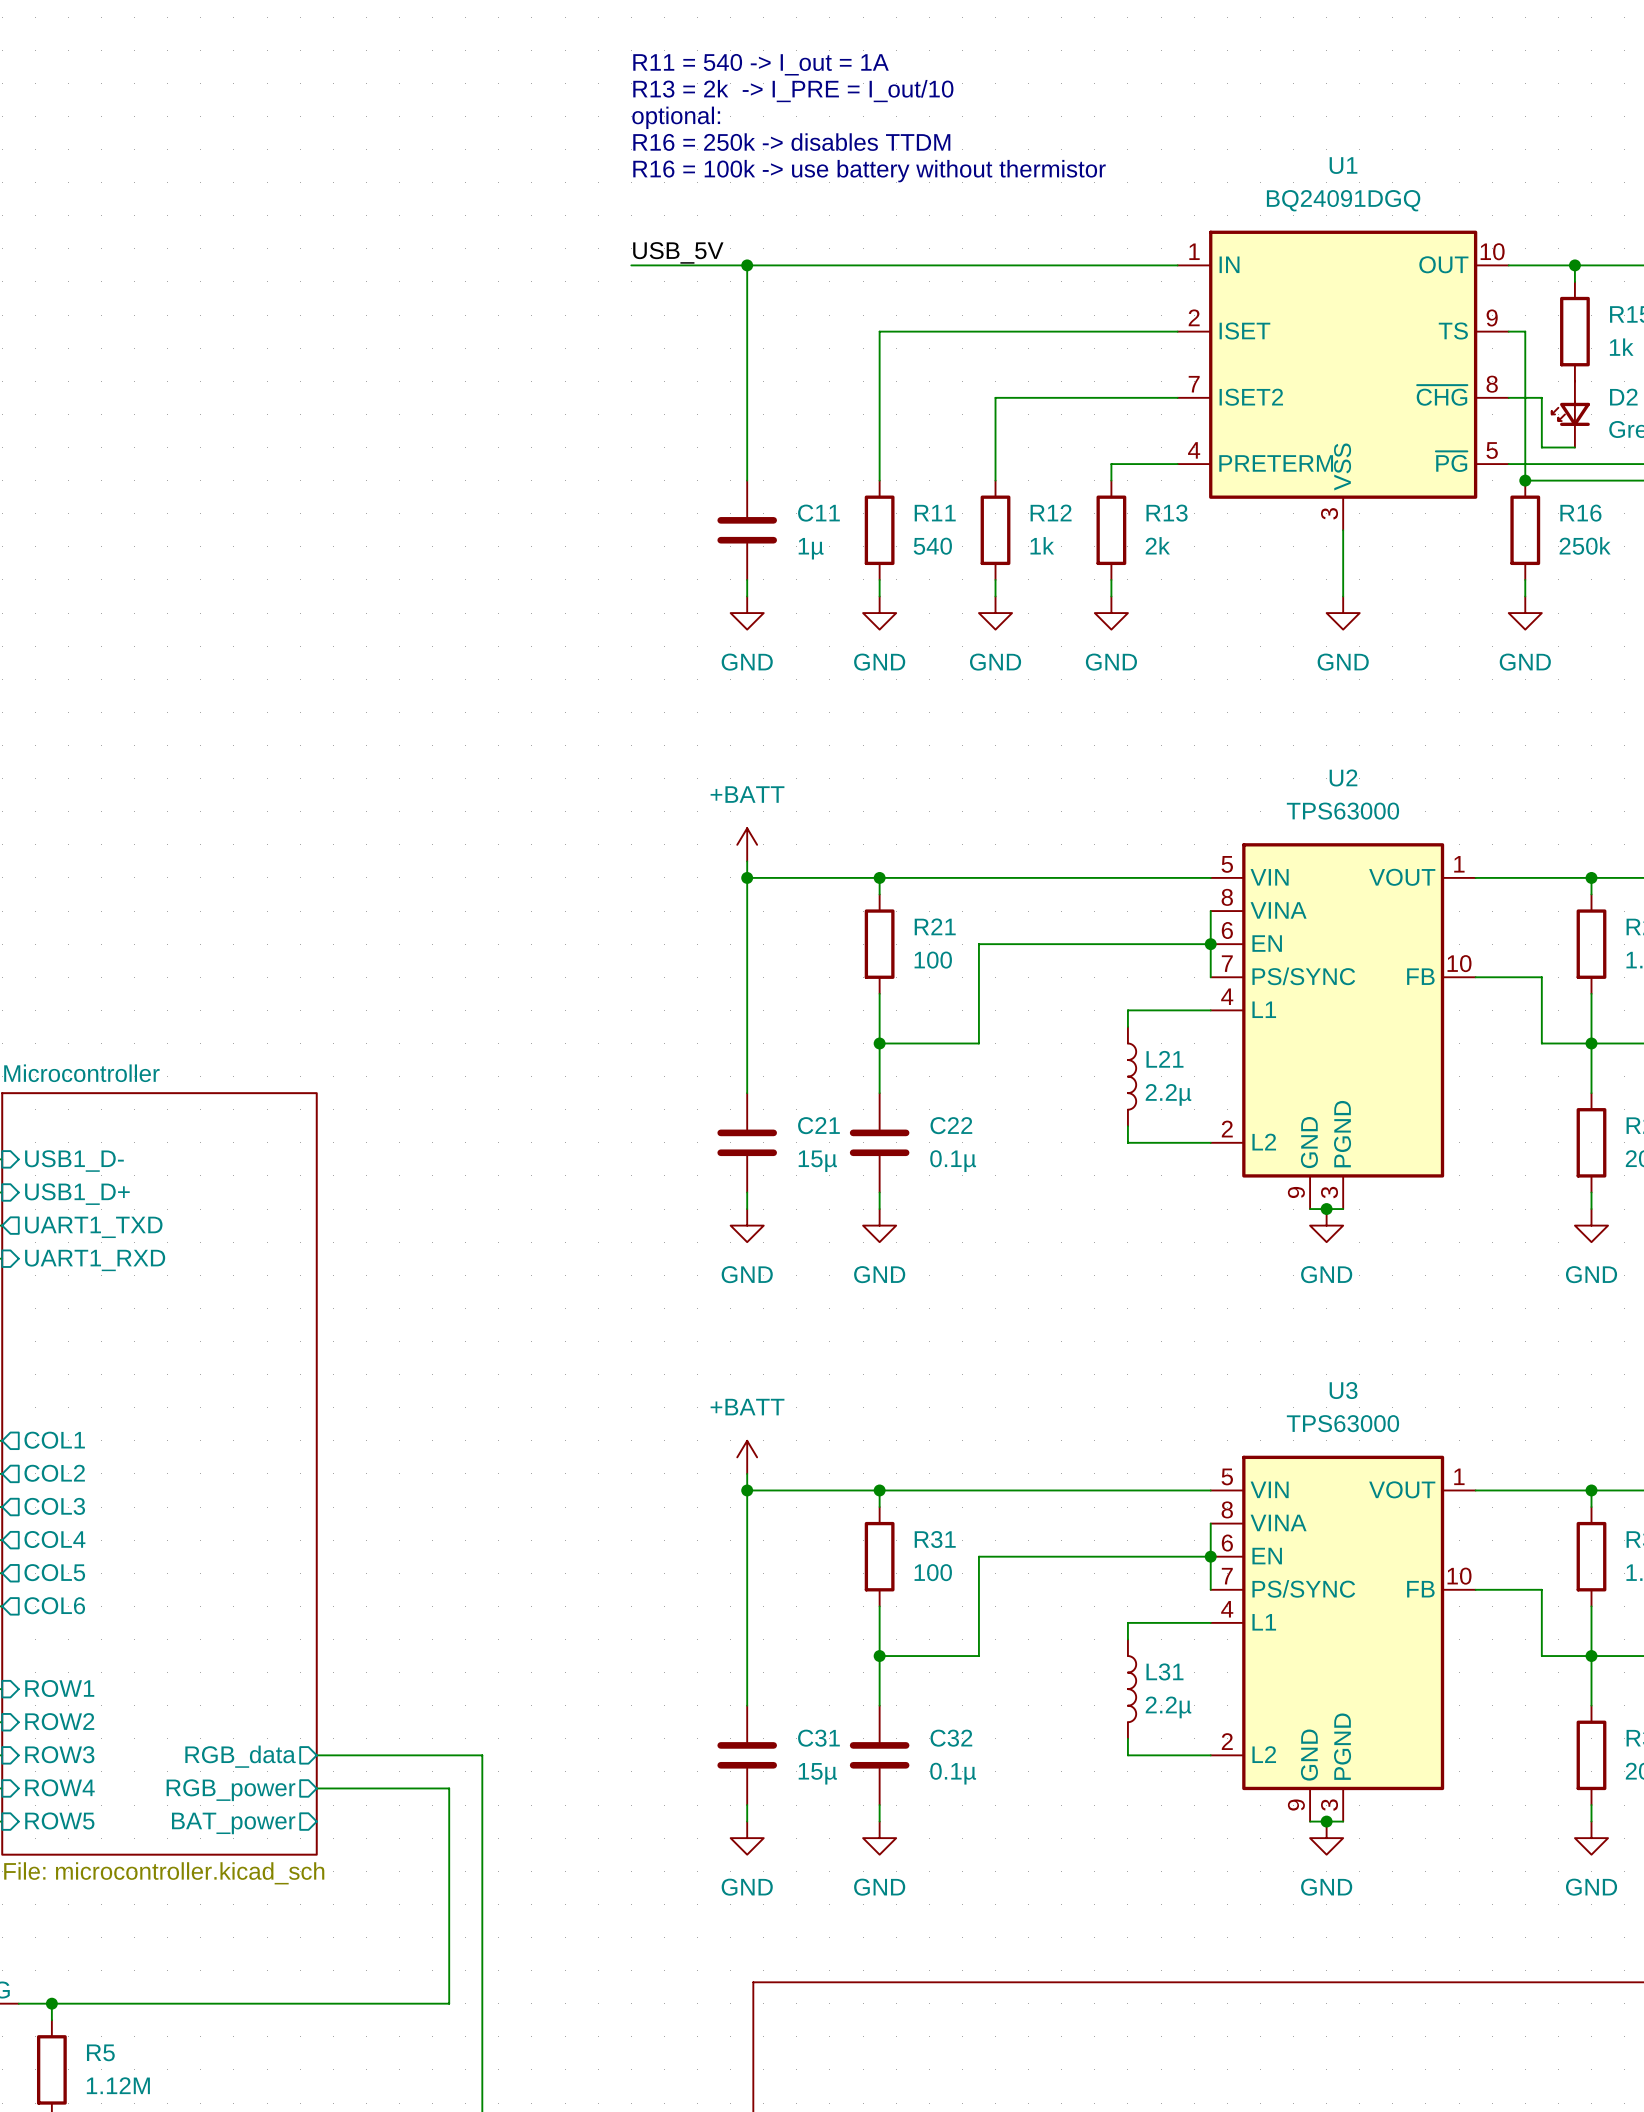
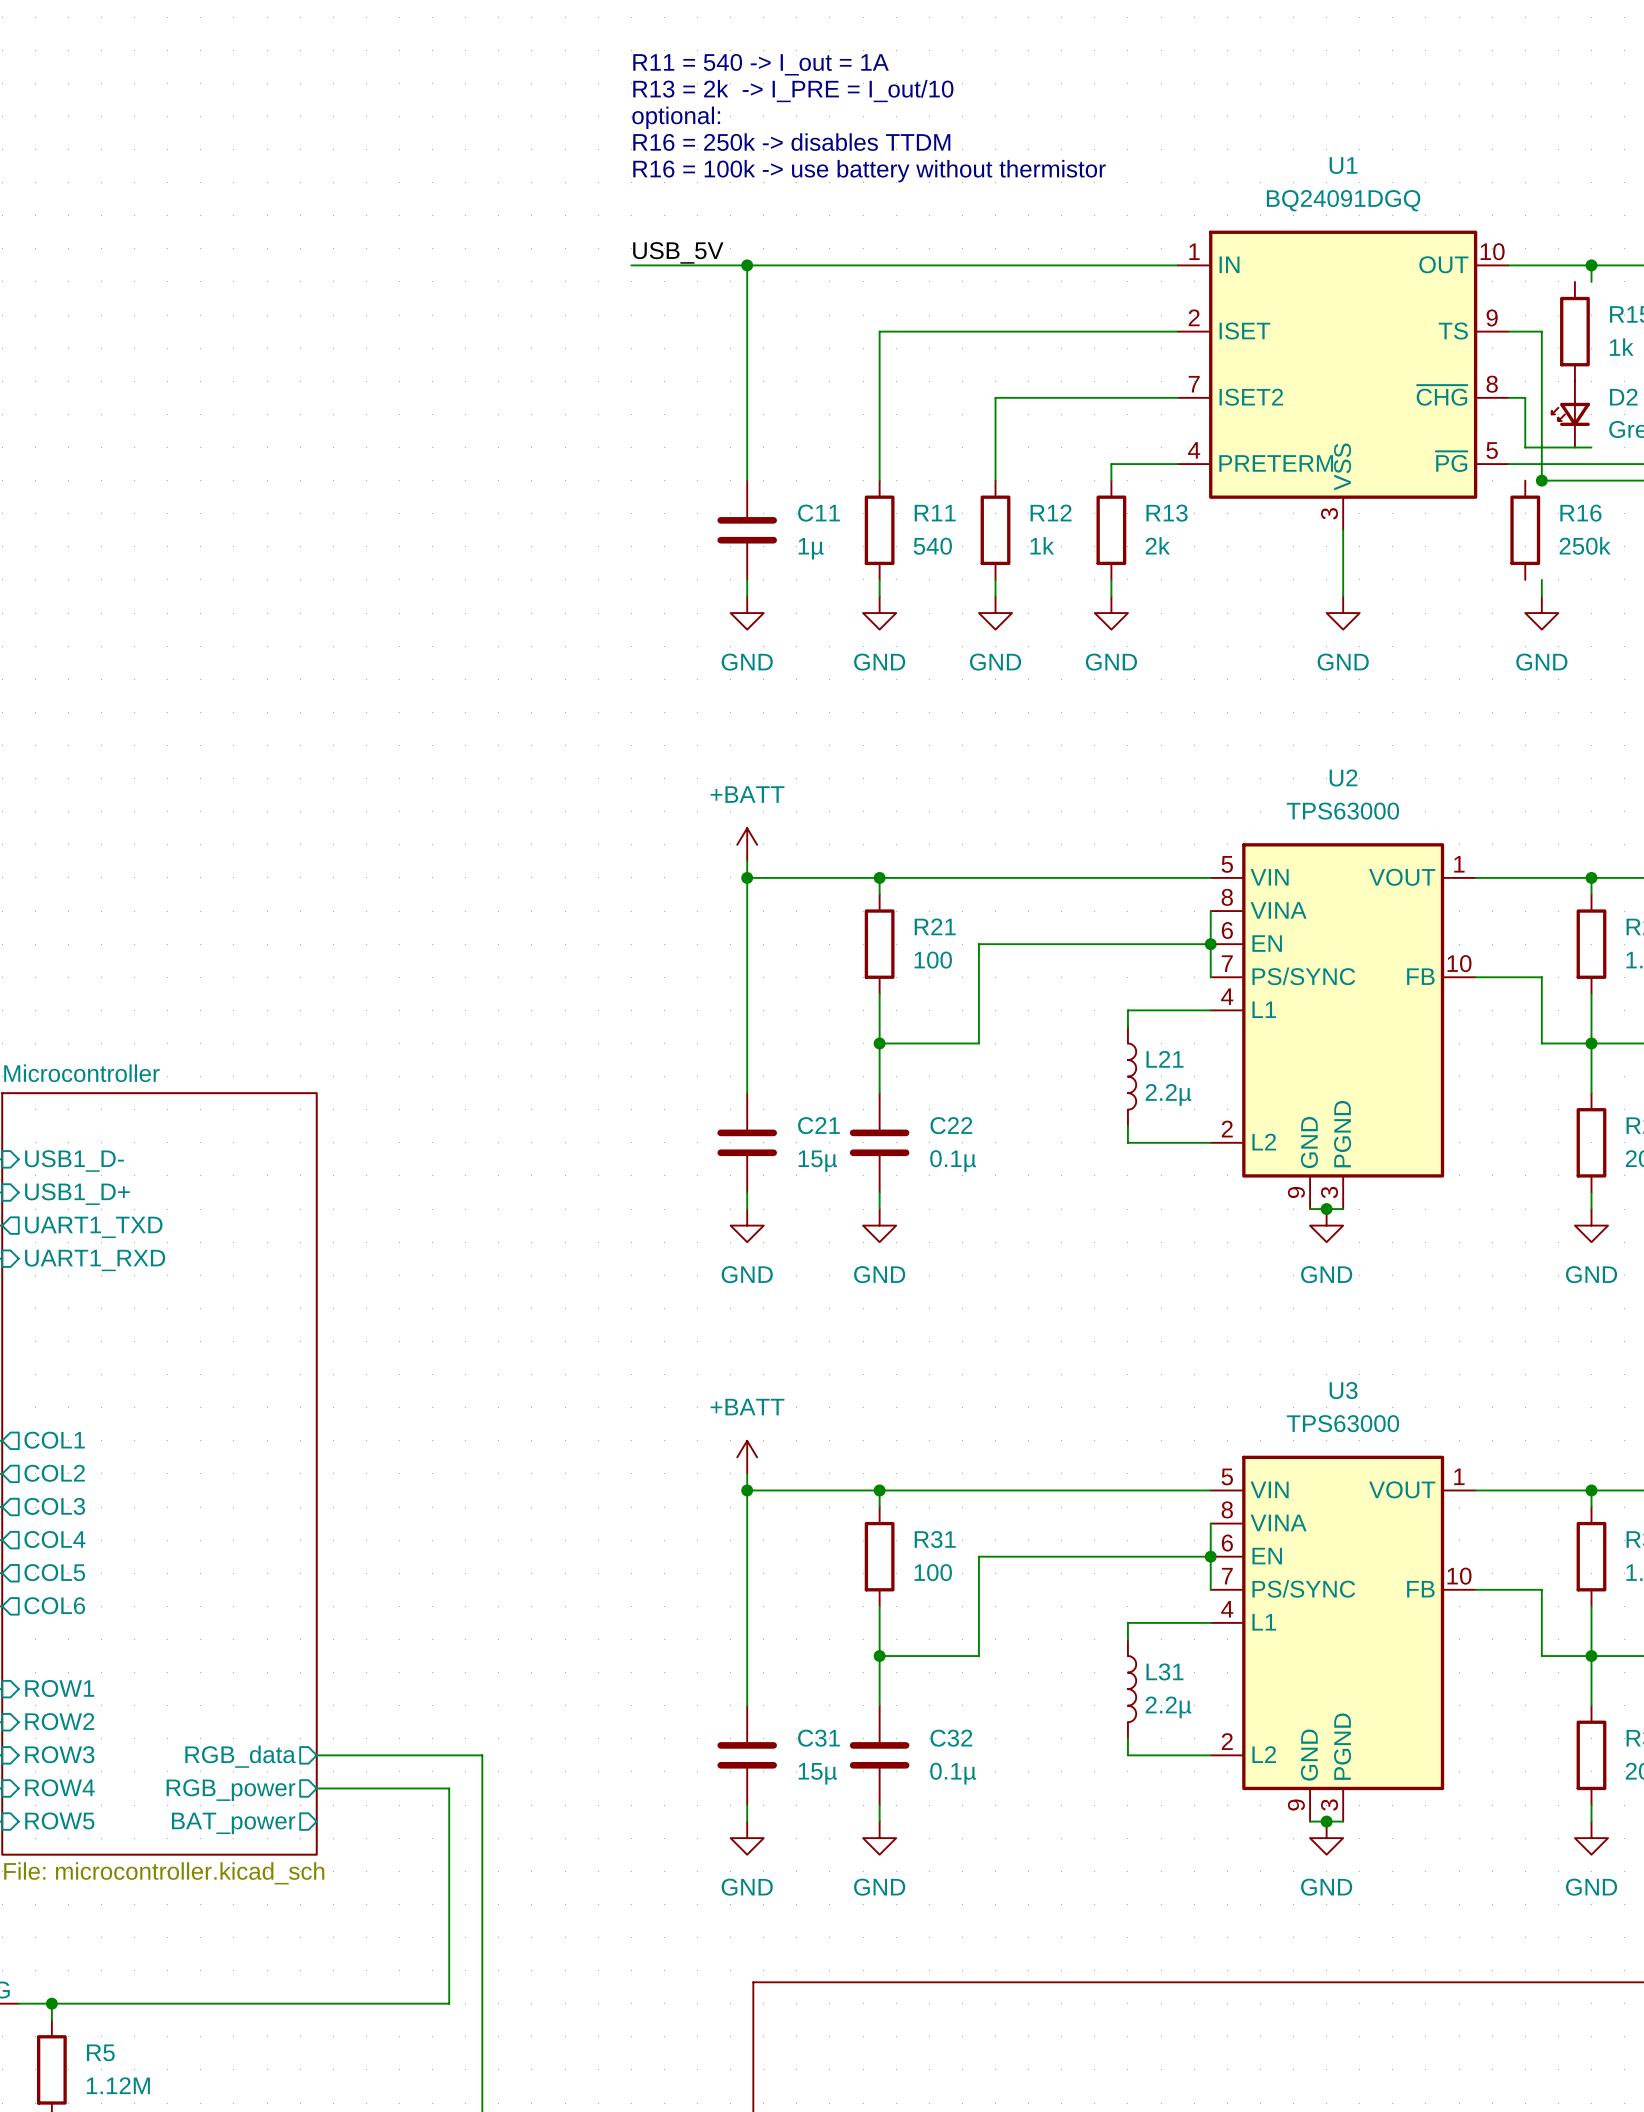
wire: (1574, 265) (1574, 281) -> (1591, 265) (1591, 281)
junction position: (1574, 265) -> (1591, 265)
wire: (1525, 331) (1525, 397) (1541, 397) -> (1525, 331) (1541, 331) (1541, 397)
wire: (1525, 447) (1525, 480) (1541, 480) -> (1525, 447) (1541, 447) (1541, 480)
wire: none -> (1574, 447) (1591, 447)
junction position: (1525, 480) -> (1541, 480)
wire: (1525, 579) (1525, 596) -> (1541, 579) (1541, 596)
power symbol position: GND (1525, 613) -> GND (1541, 613)

